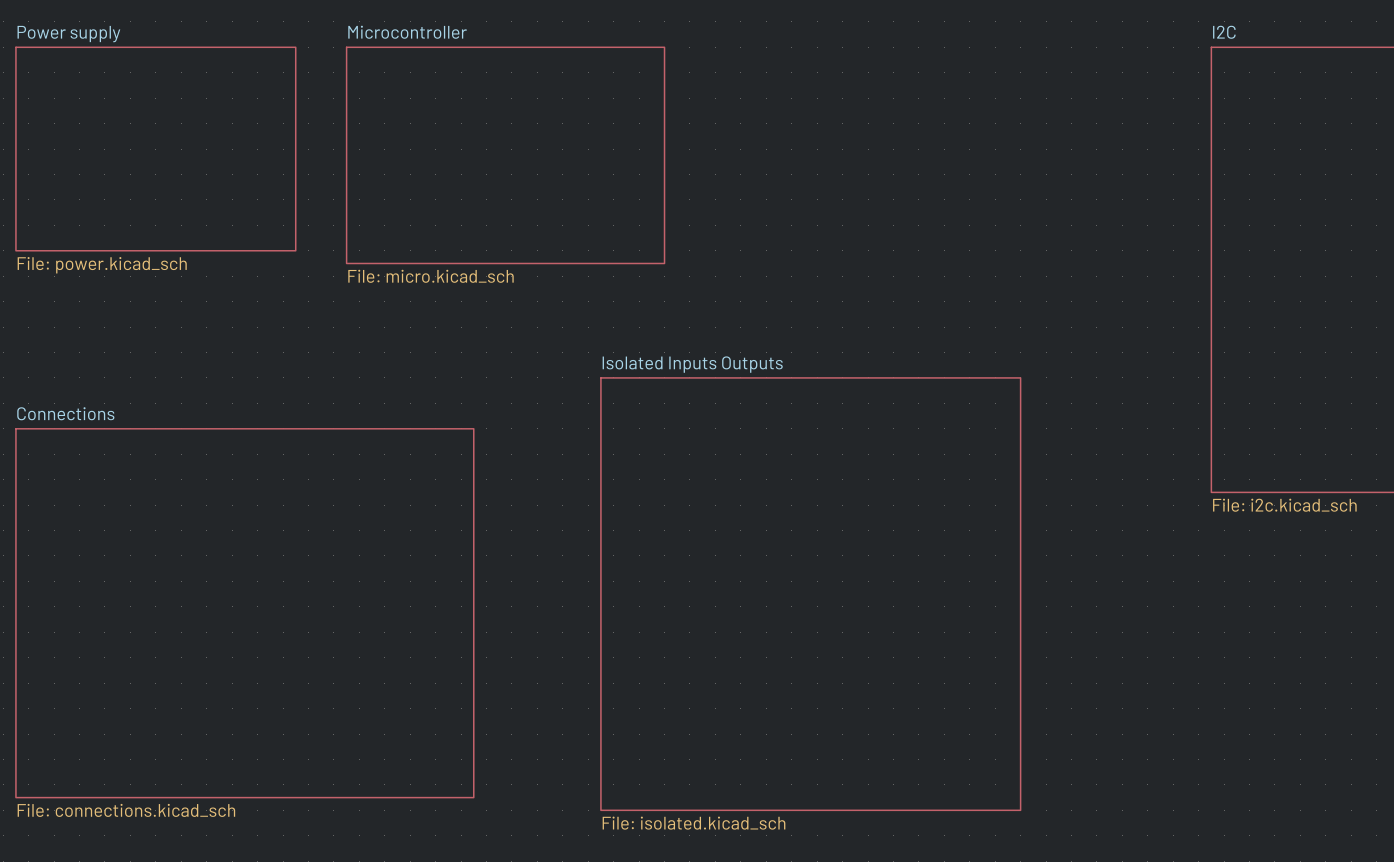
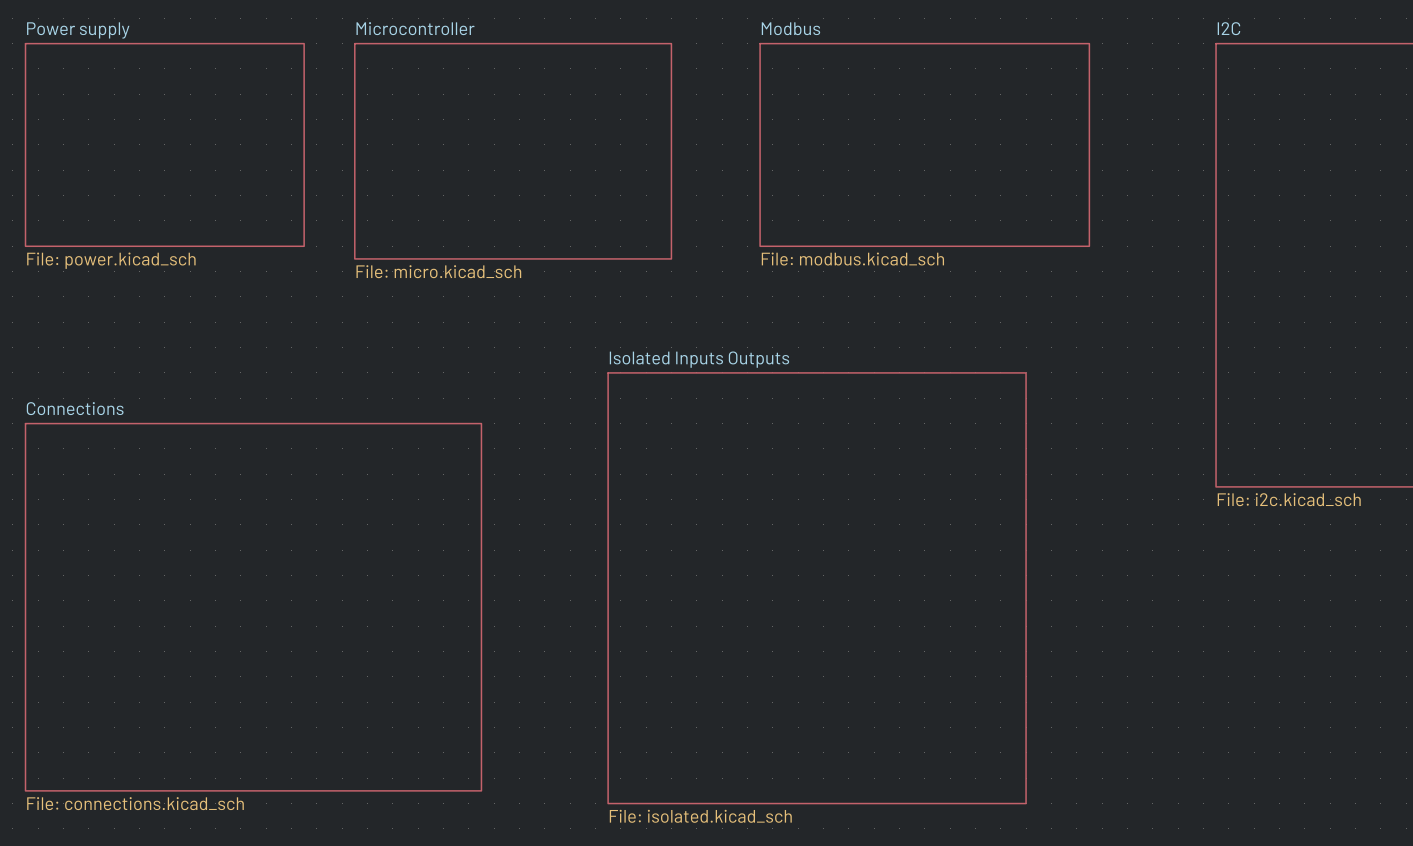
sheet Modbus: none -> File: modbus.kicad_sch (924, 144)

